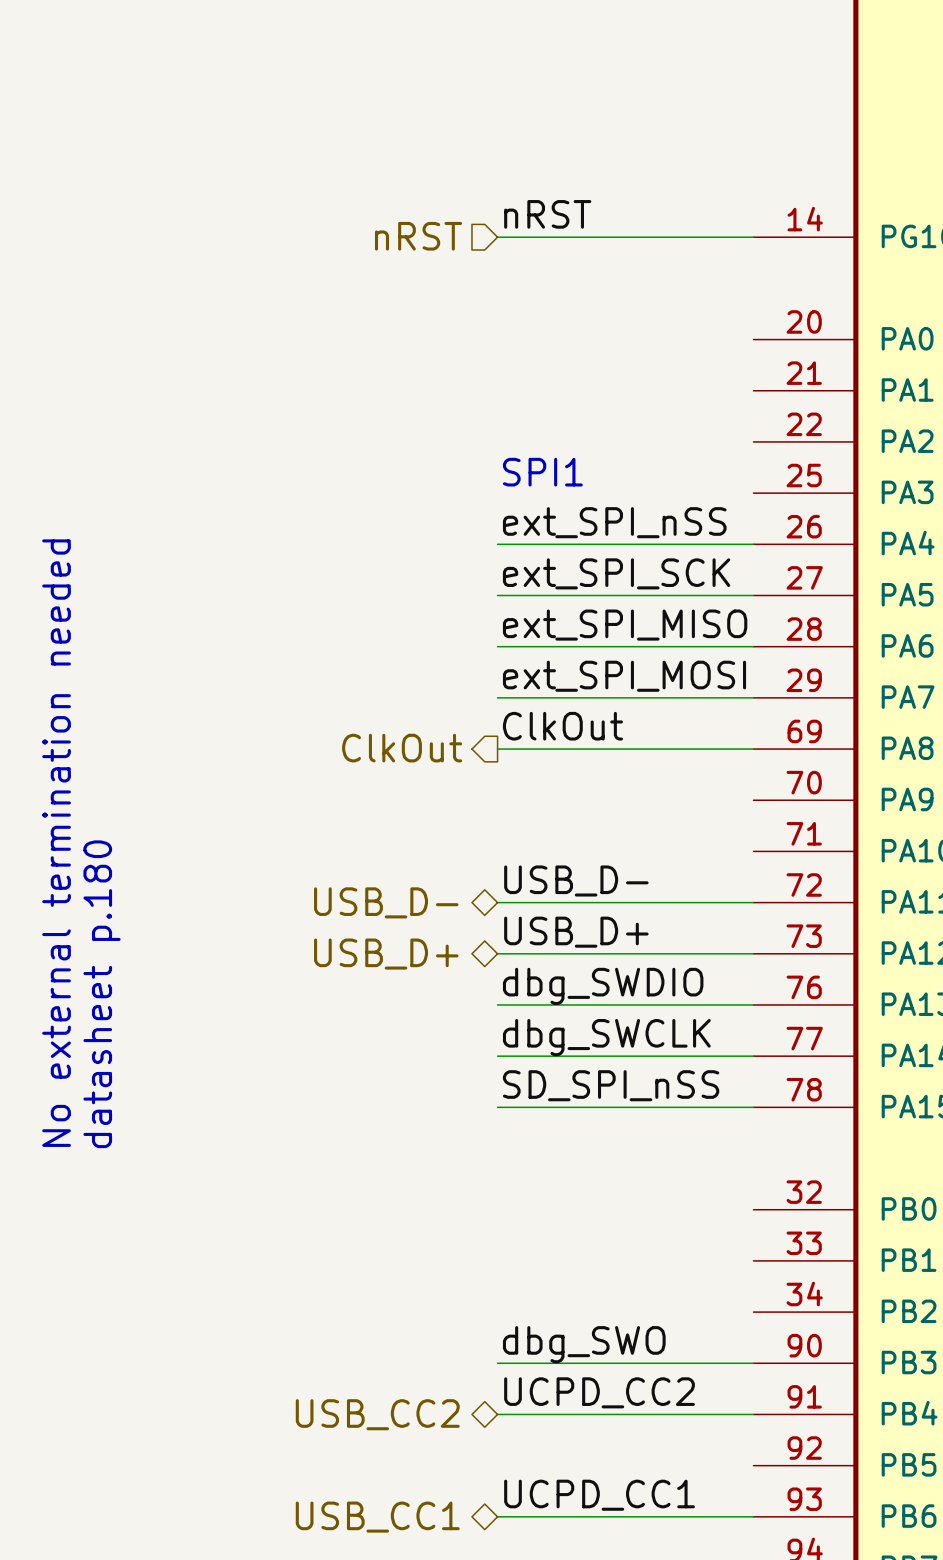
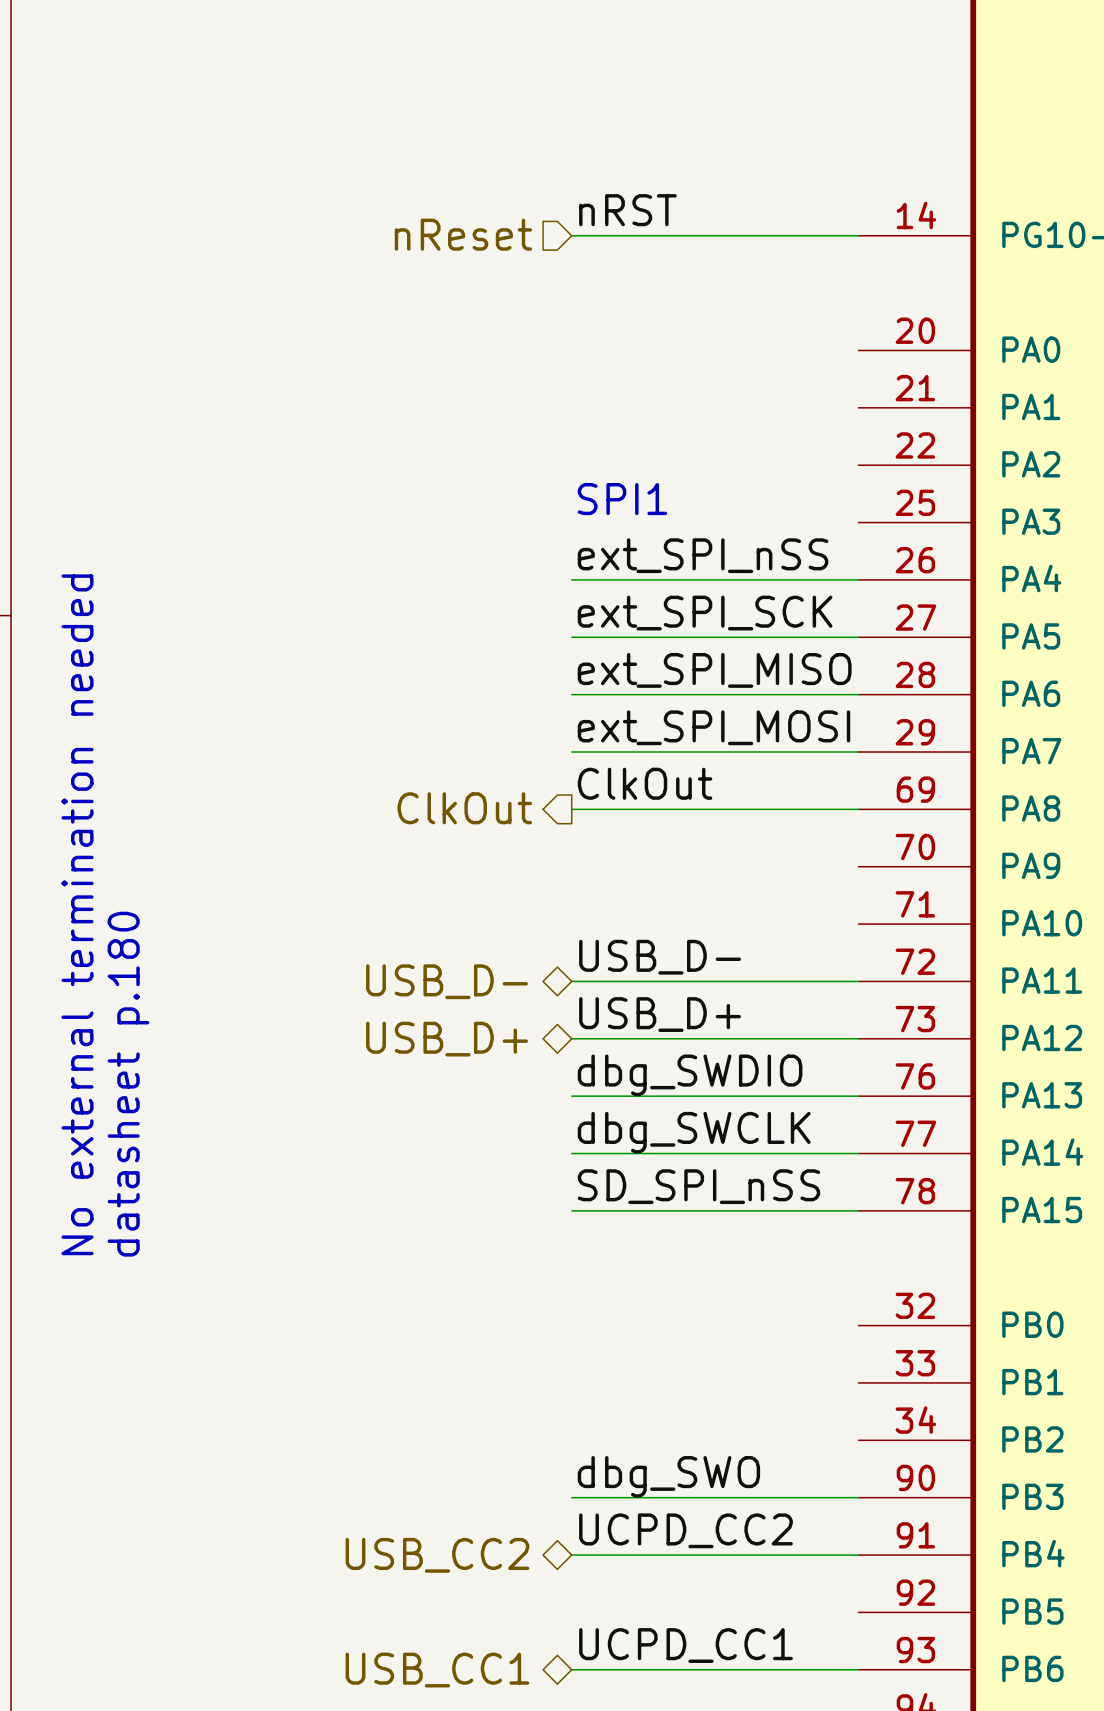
hierarchical label: nRST (418, 236) -> nReset (463, 234)

